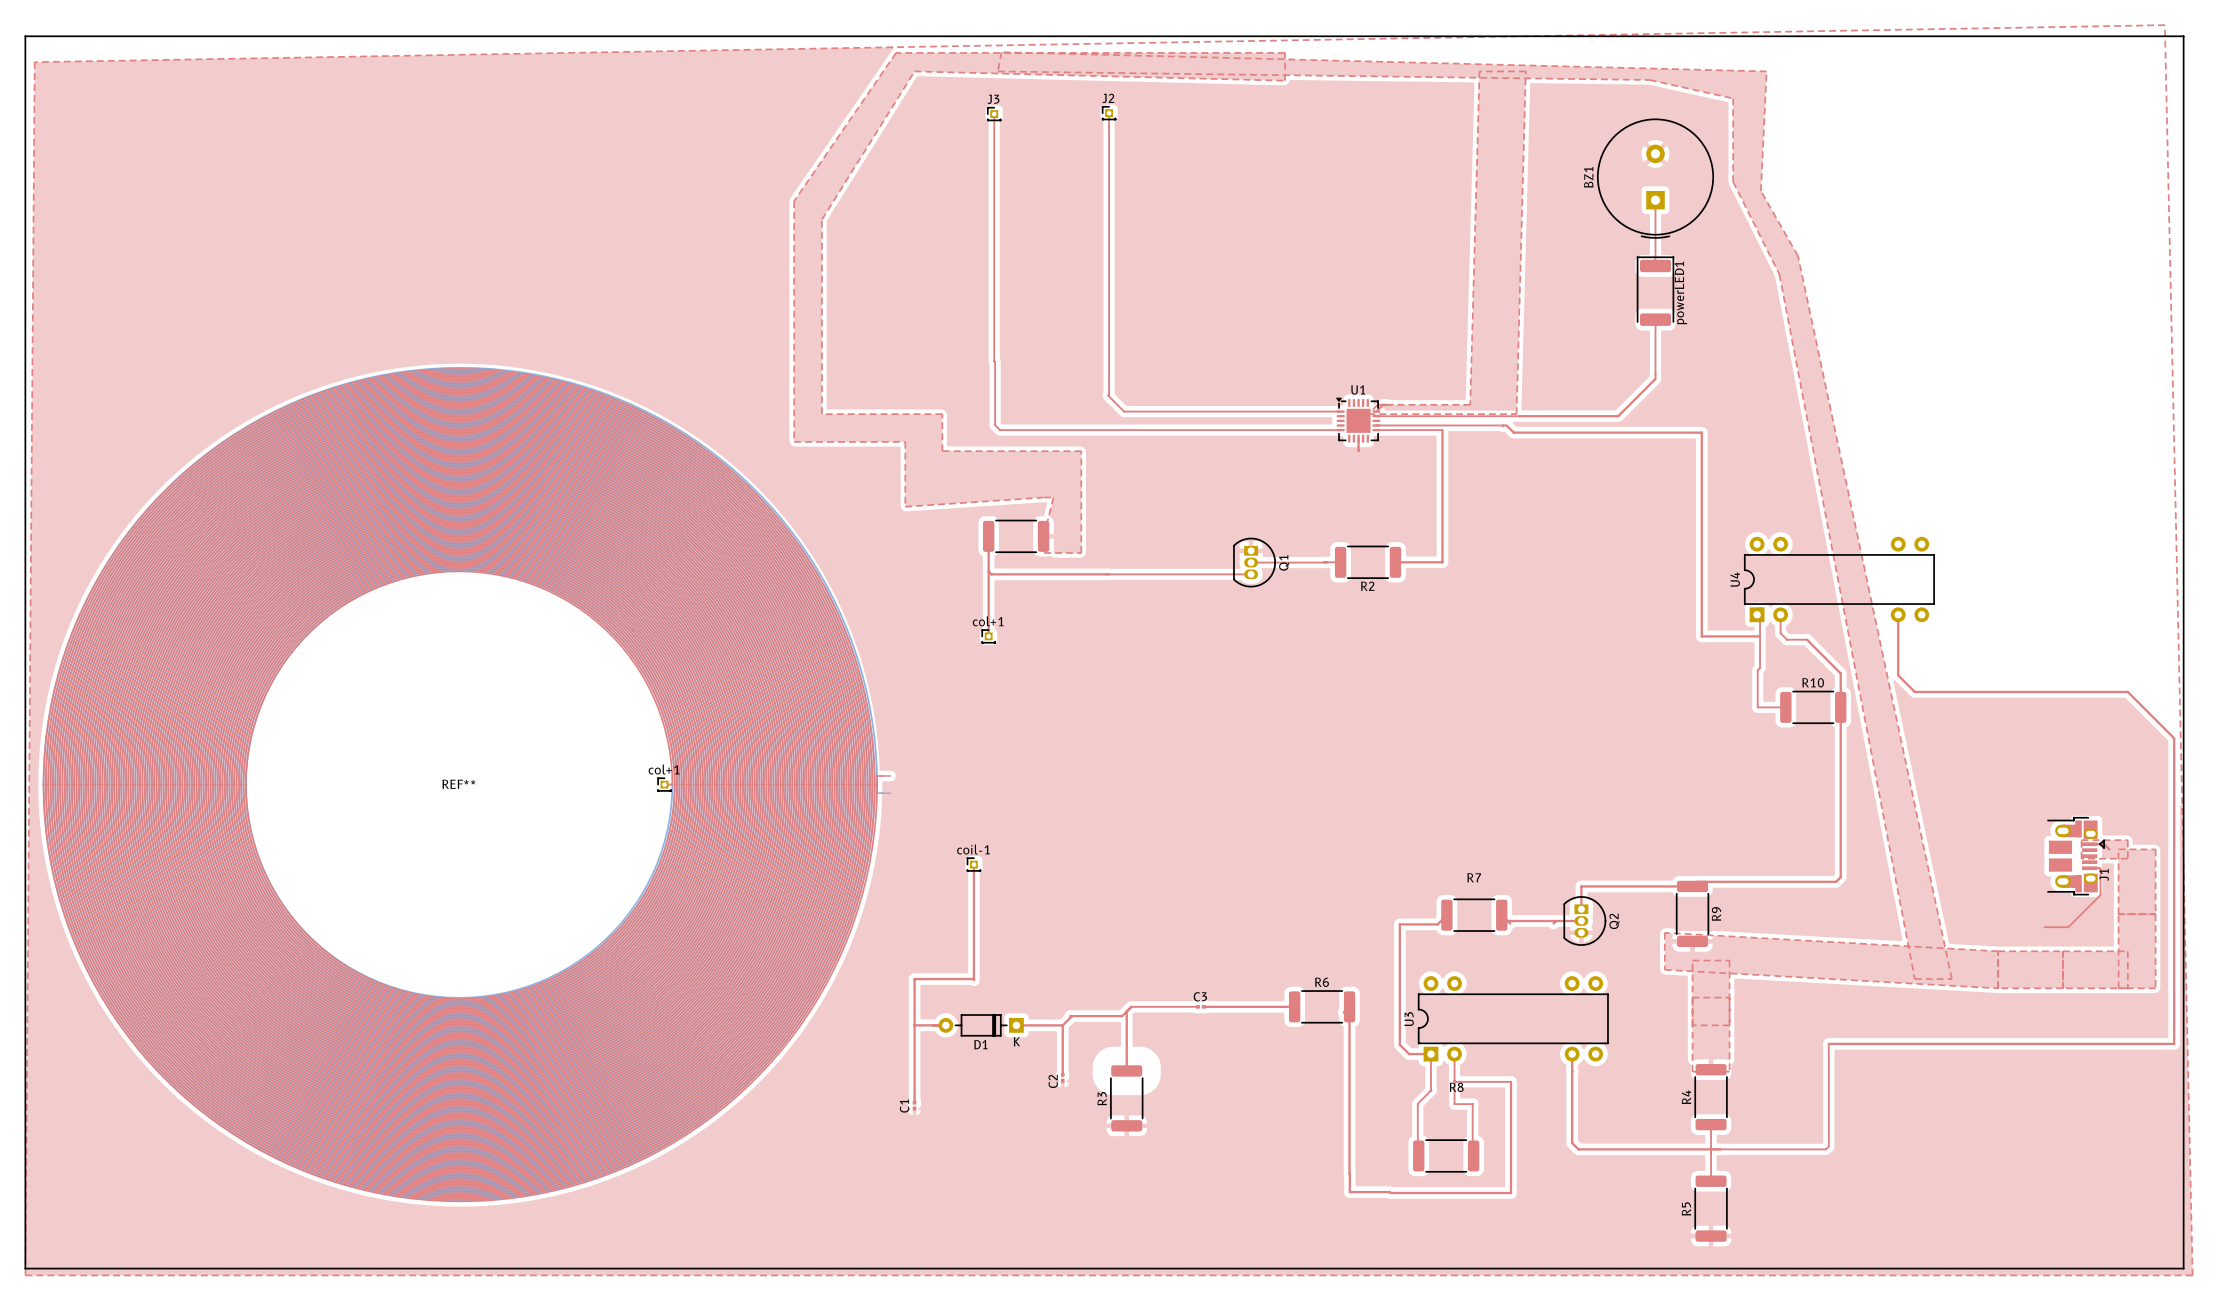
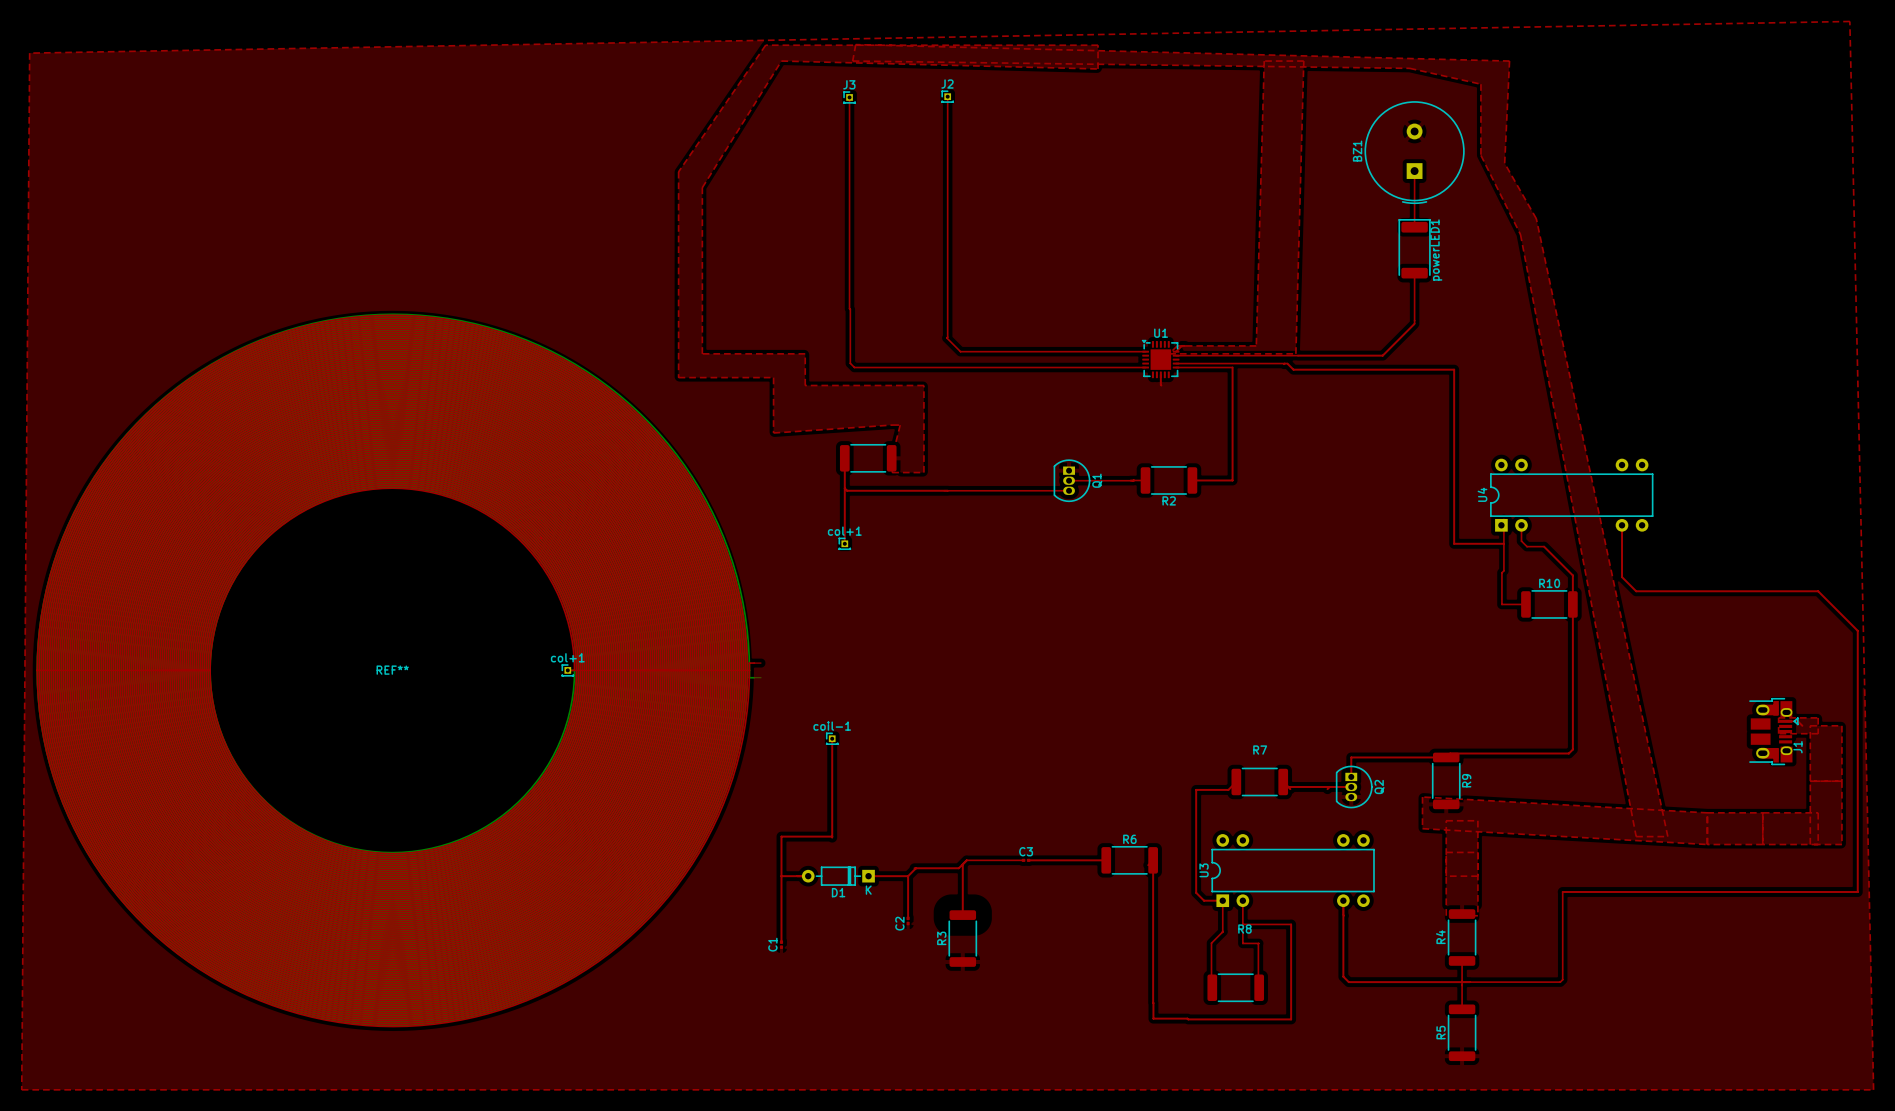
board edge: (25, 36) (2183, 36) (2183, 1268) (25, 1268) (25, 36) -> none
top track: (2089, 868) (2100, 869) (2100, 895) (2068, 927) (2044, 927) -> none

